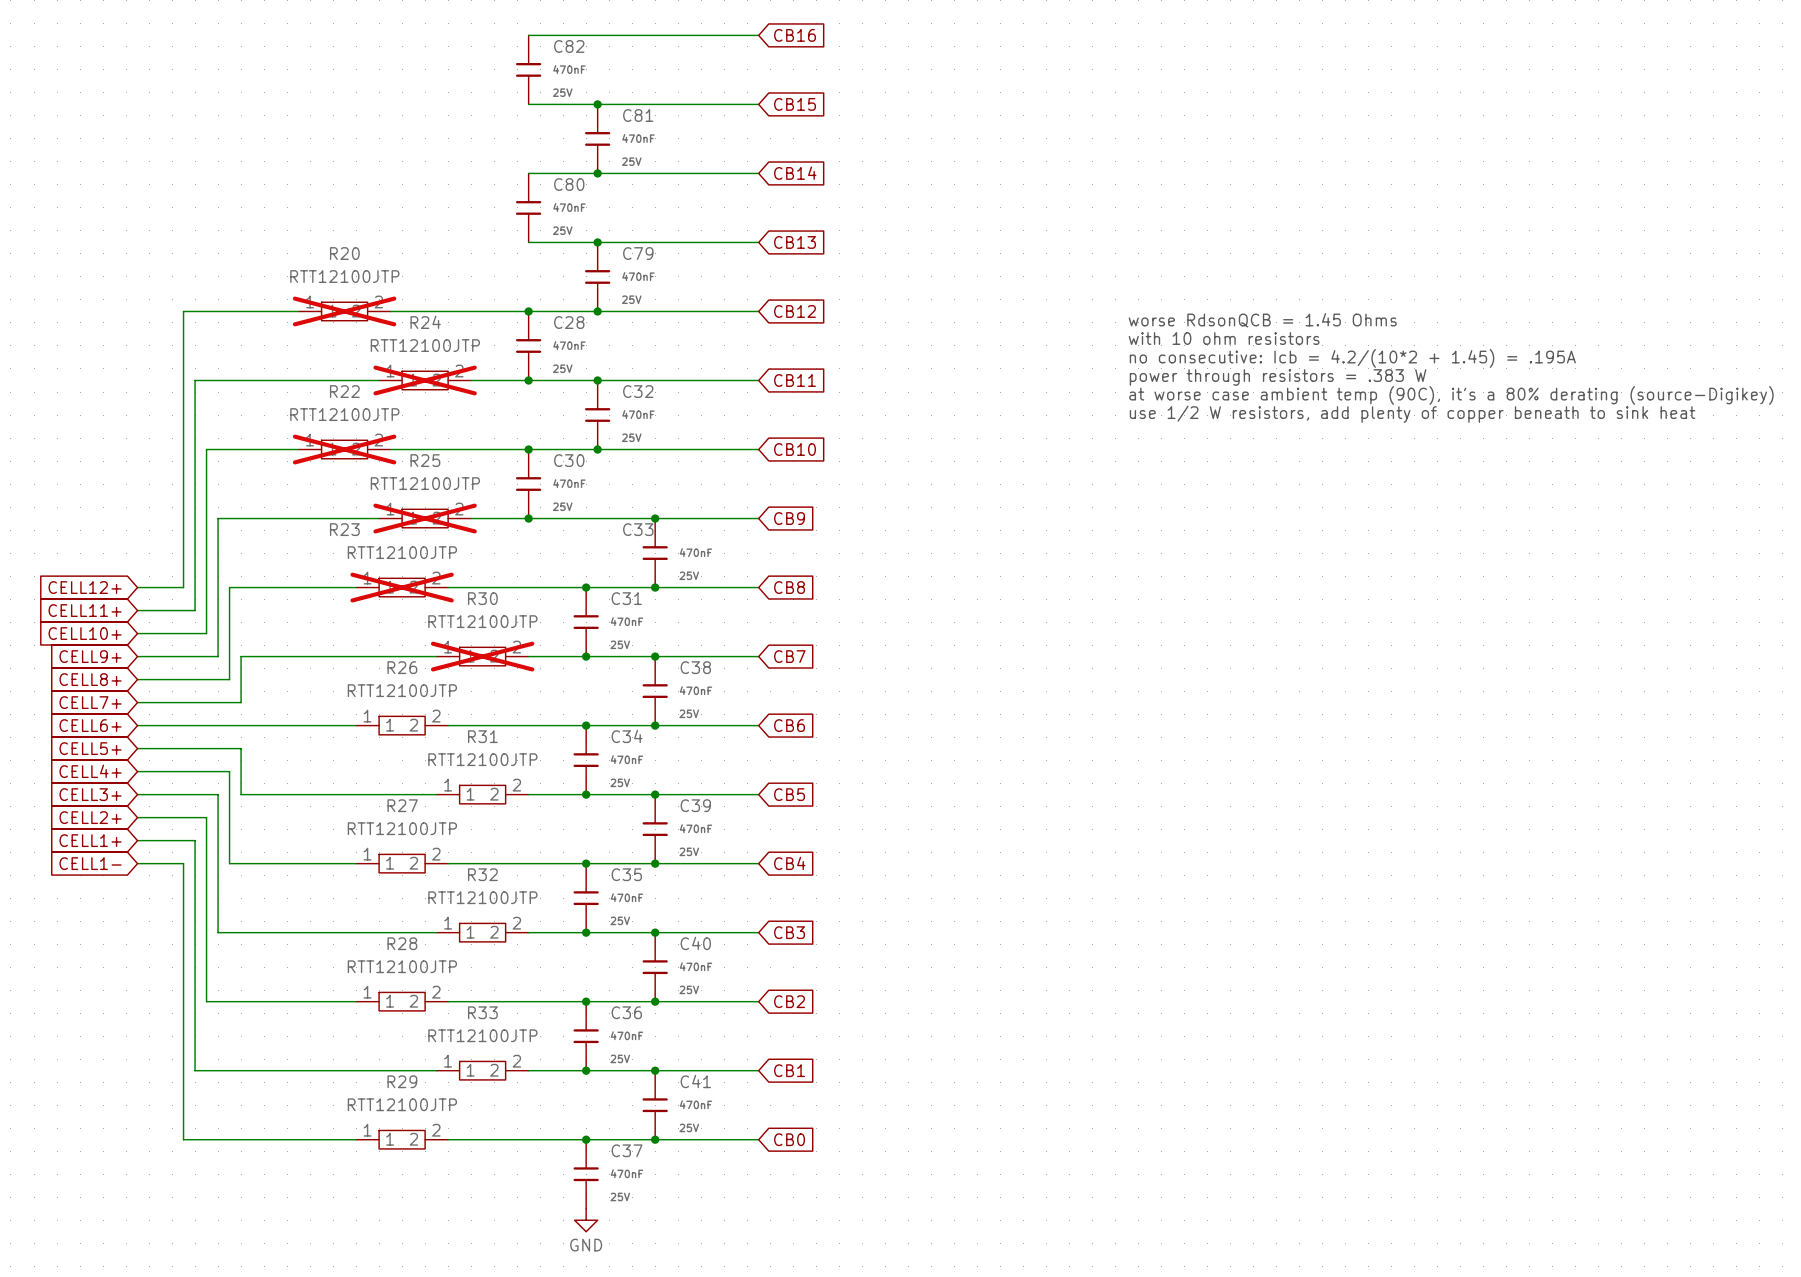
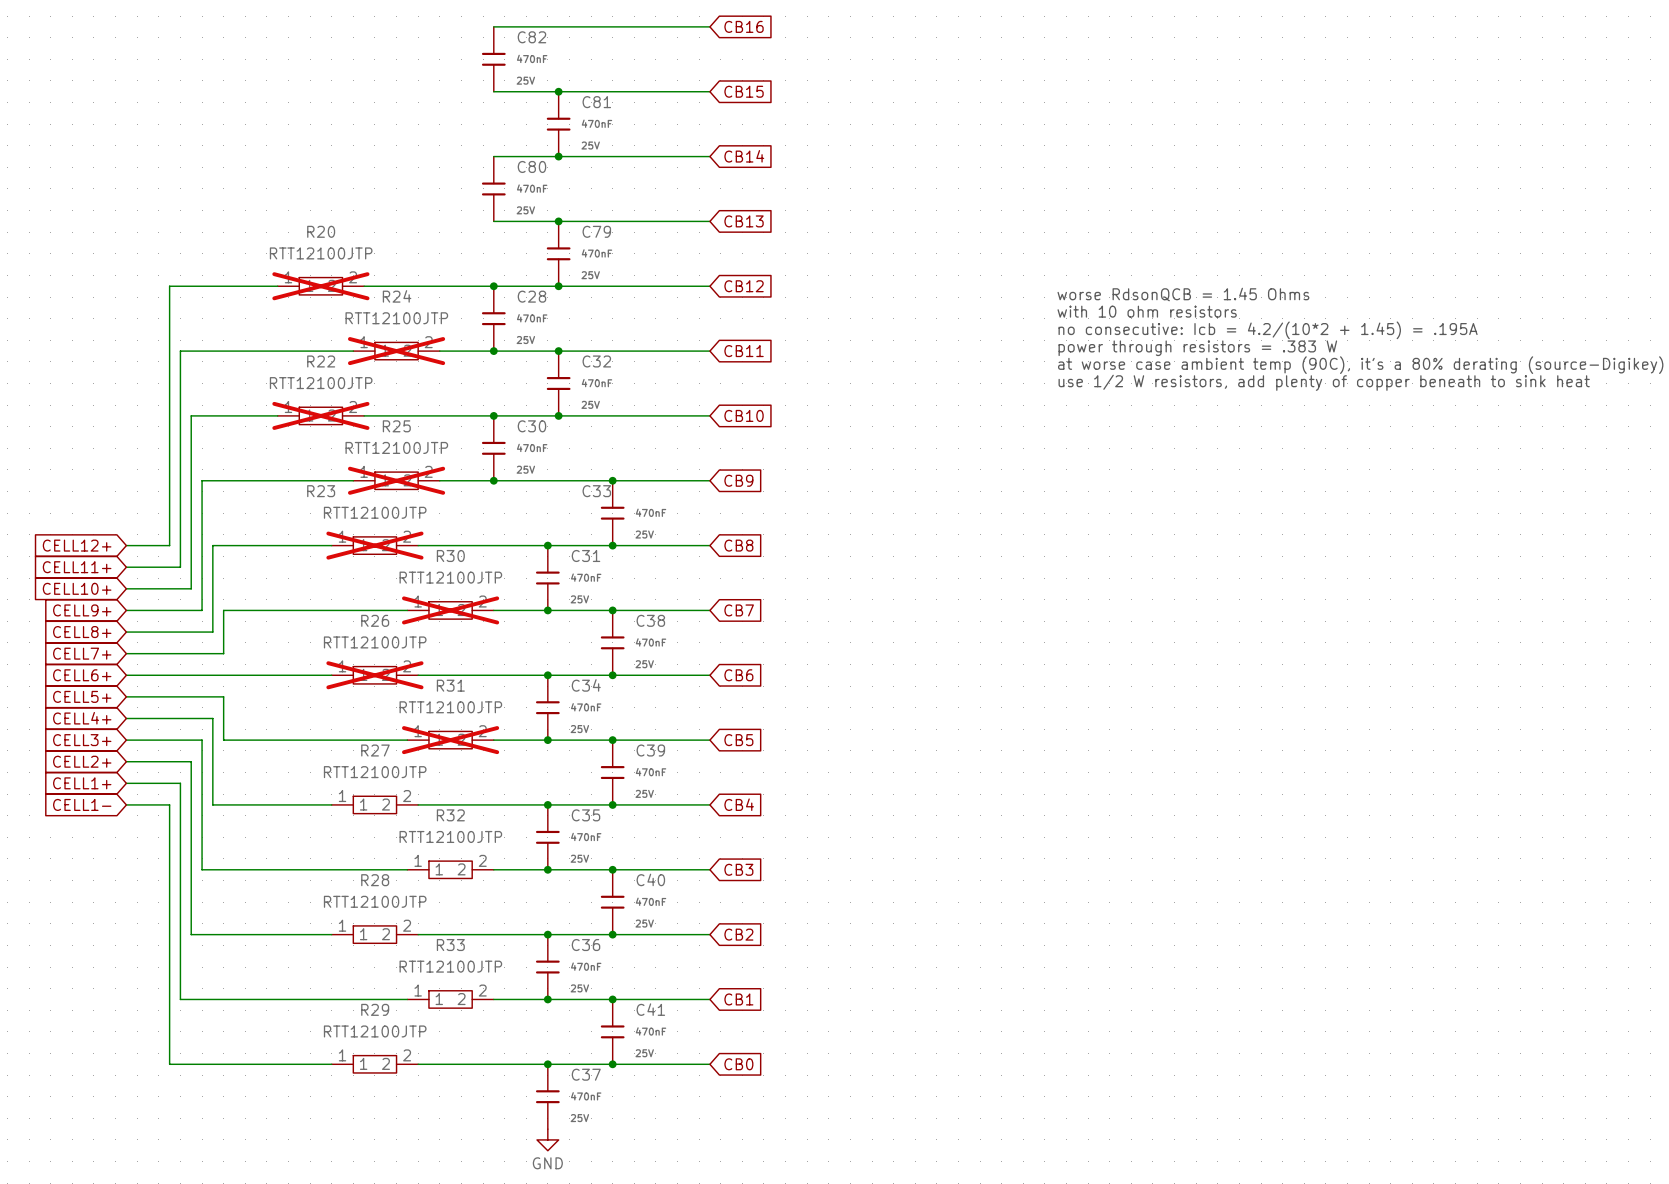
R26 do-not-place cross: none -> (374, 675)
R31 do-not-place cross: none -> (450, 740)

